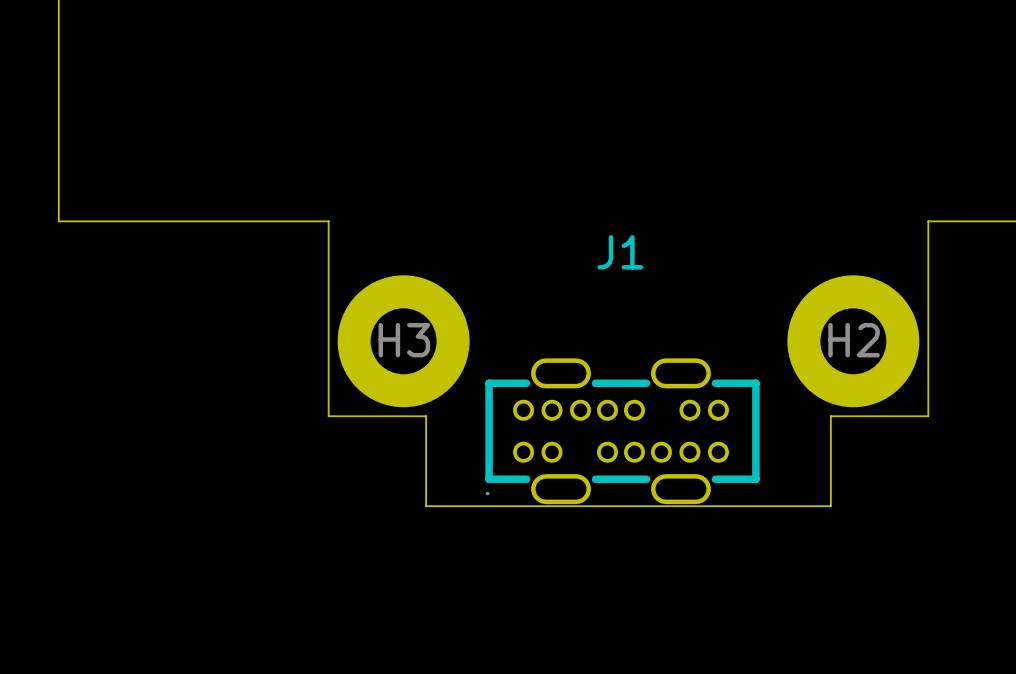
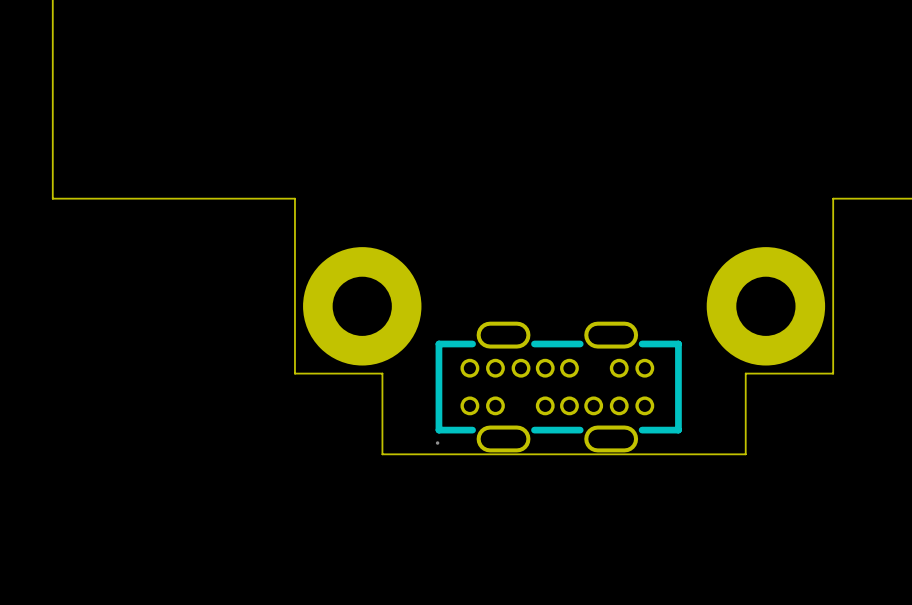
J1 name: J1 (620, 252) -> none
H3 name: H3 (404, 340) -> none
H2 name: H2 (854, 340) -> none

